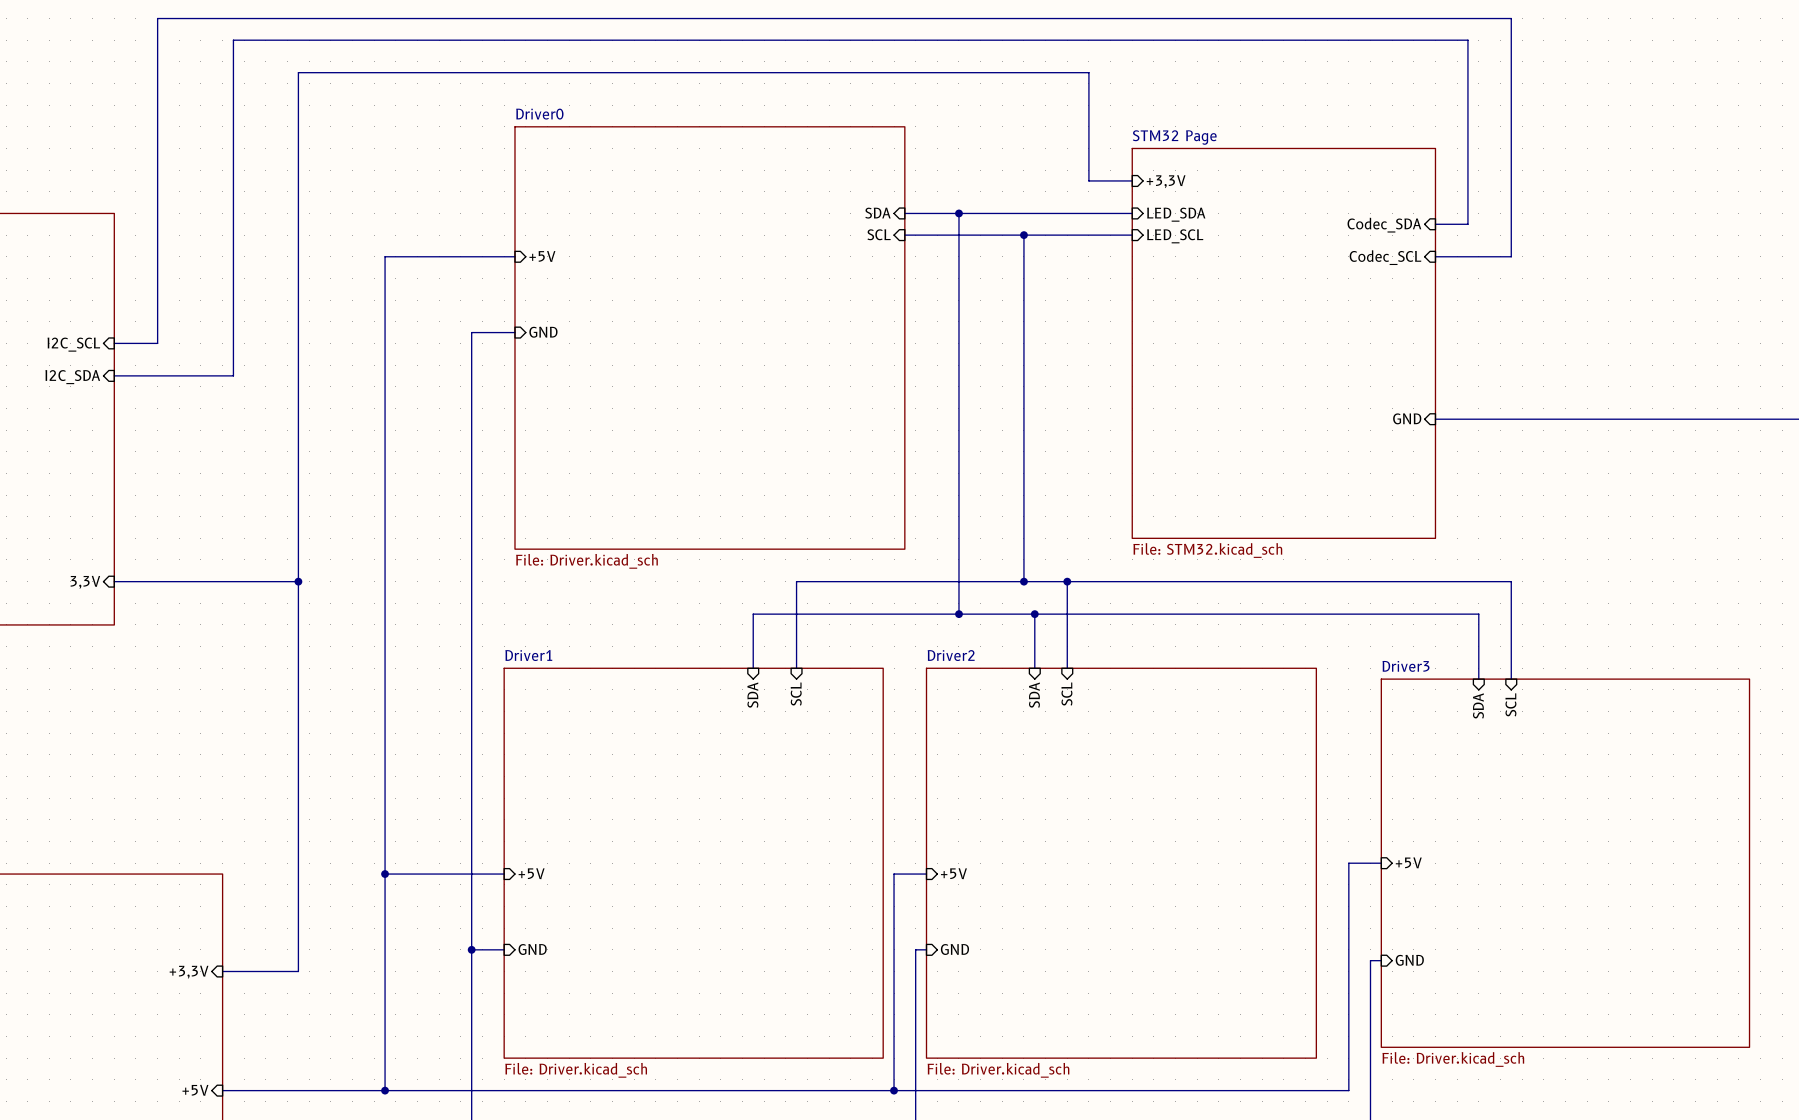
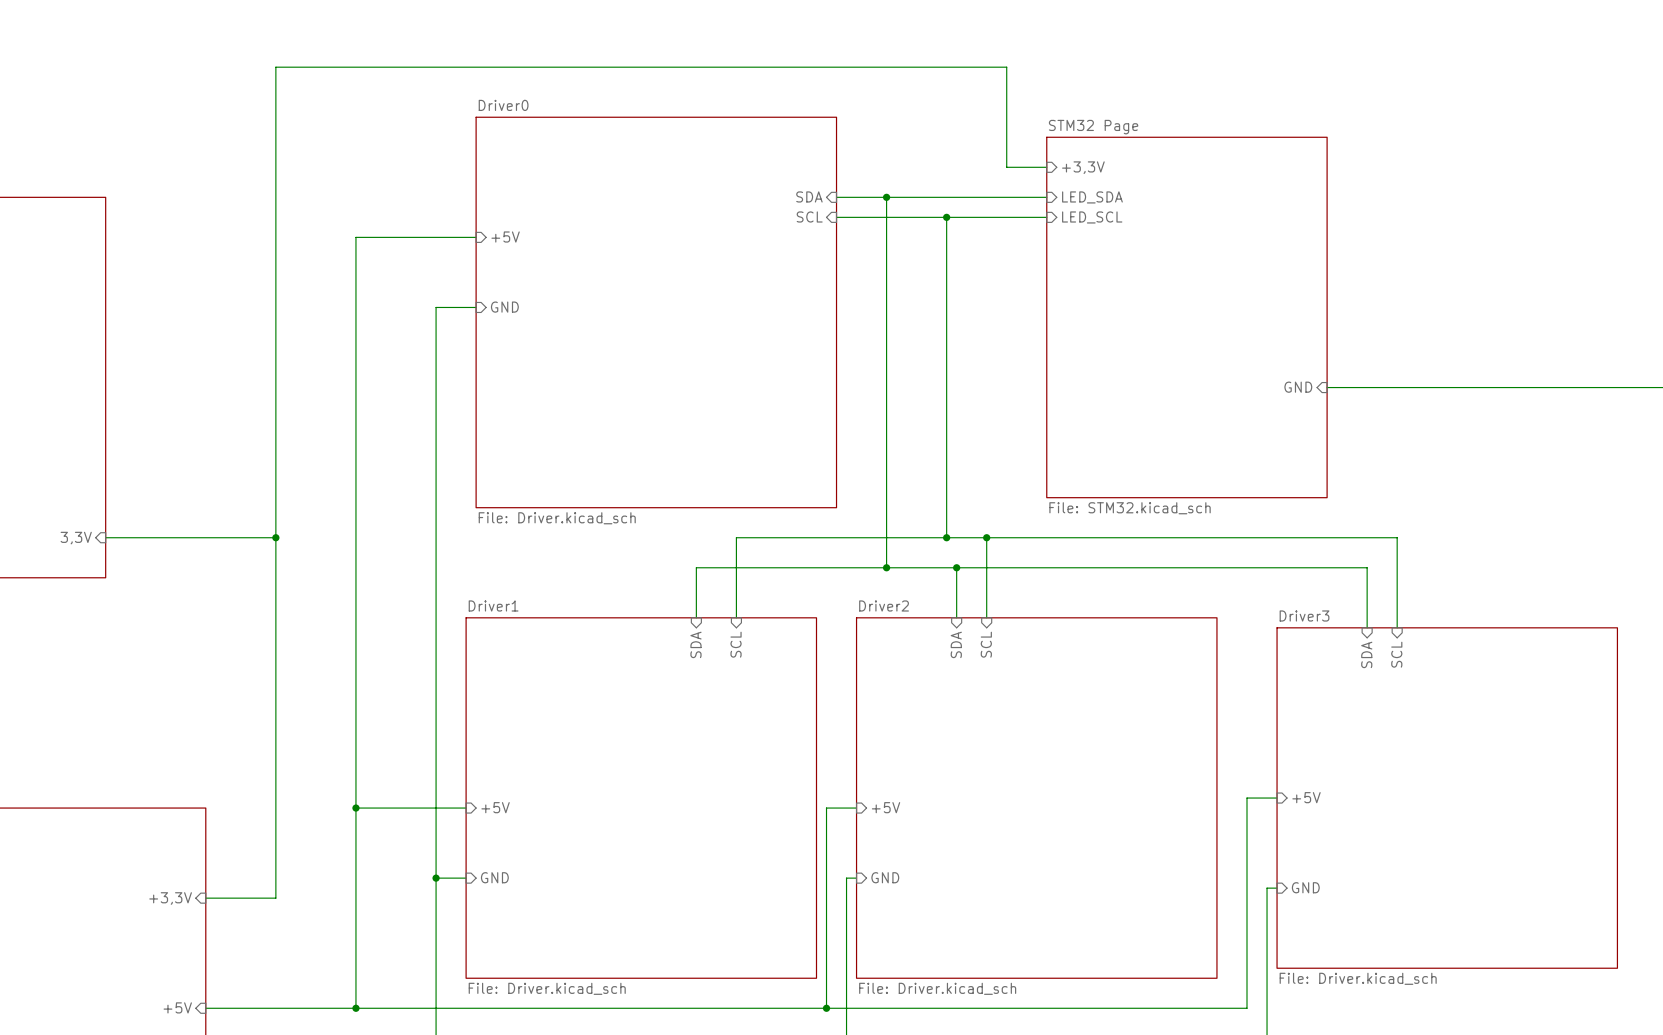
wire: (1435, 224) (1467, 224) (1467, 40) (233, 40) (233, 375) (114, 375) -> none
sheet pin: Codec_SDA (1384, 225) -> none
wire: (1435, 256) (1511, 256) (1511, 18) (157, 18) (157, 343) (114, 343) -> none
sheet pin: Codec_SCL (1385, 257) -> none
sheet pin: I2C_SCL (73, 344) -> none
sheet pin: I2C_SDA (72, 377) -> none

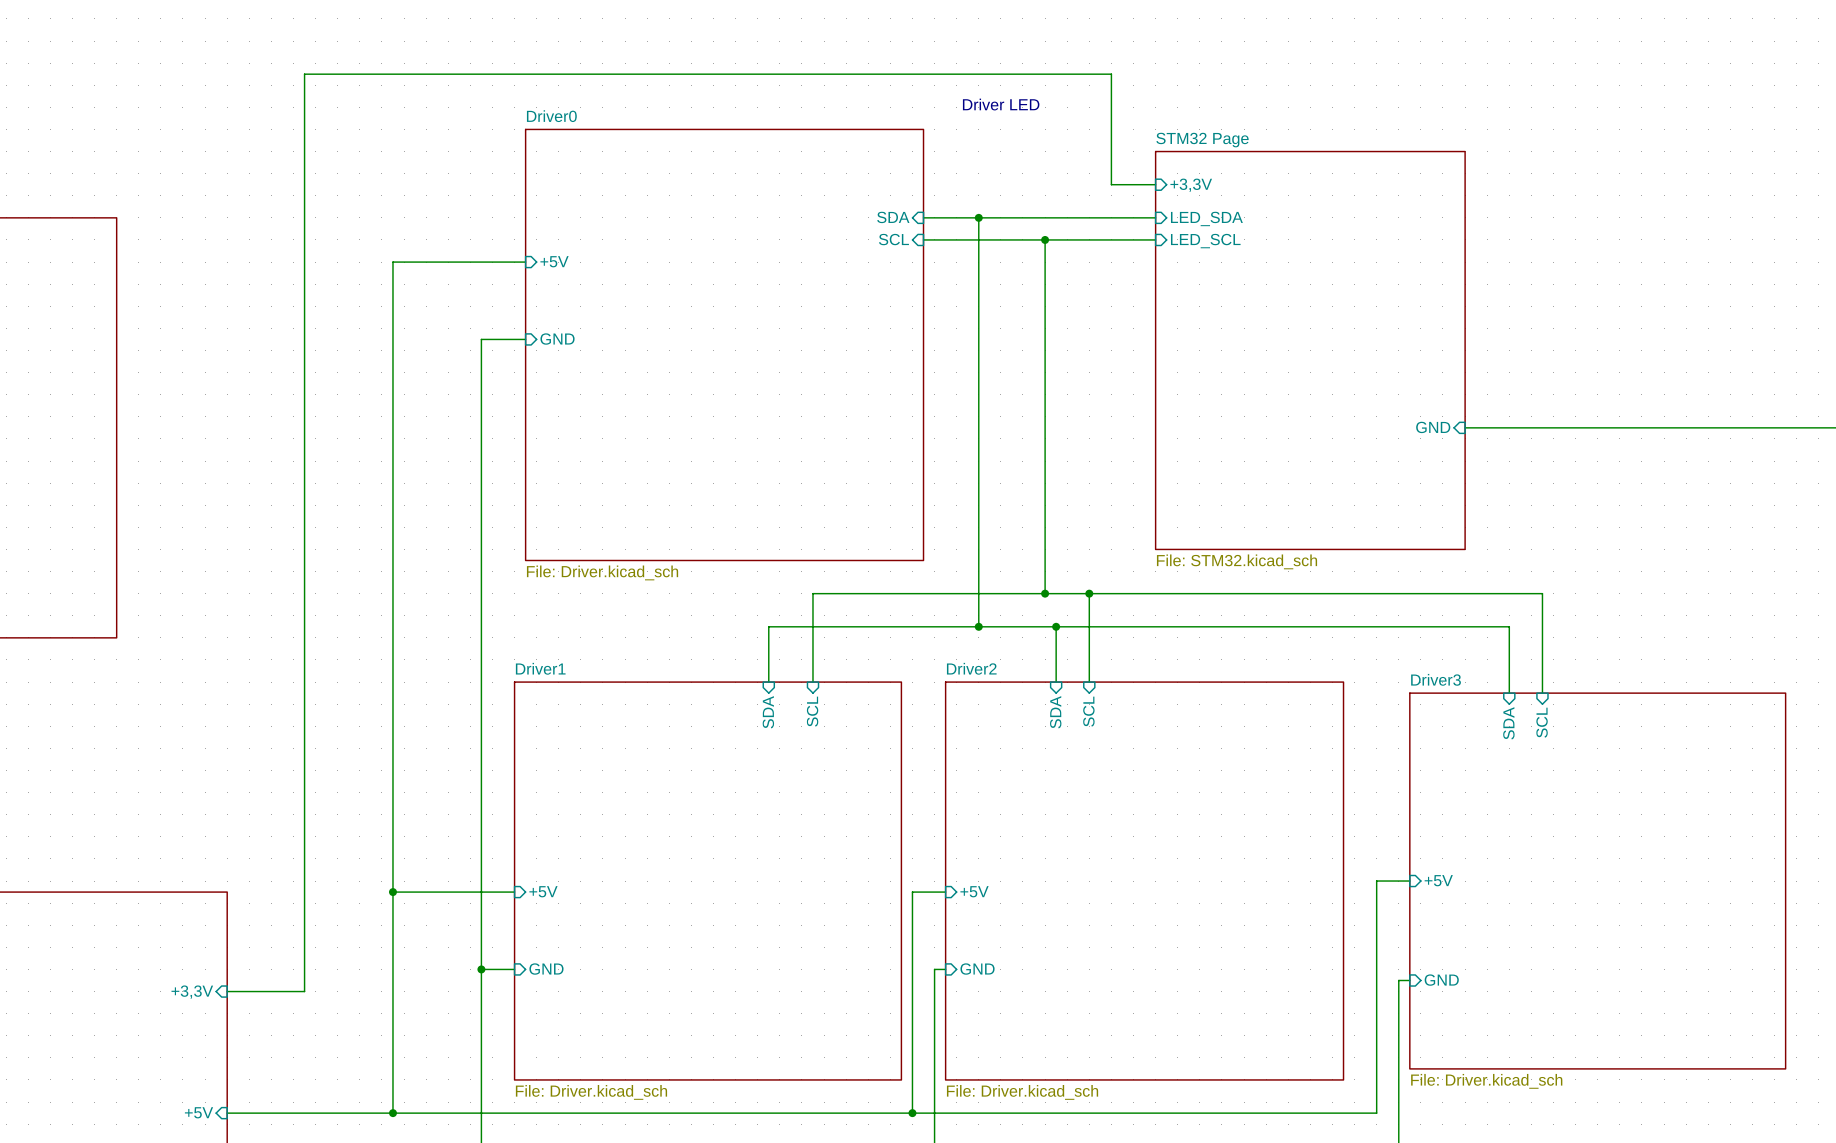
text: none -> Driver LED (1001, 104)
wire: (105, 537) (275, 537) -> none
junction: (275, 537) -> none
sheet pin: 3,3V (76, 538) -> none

